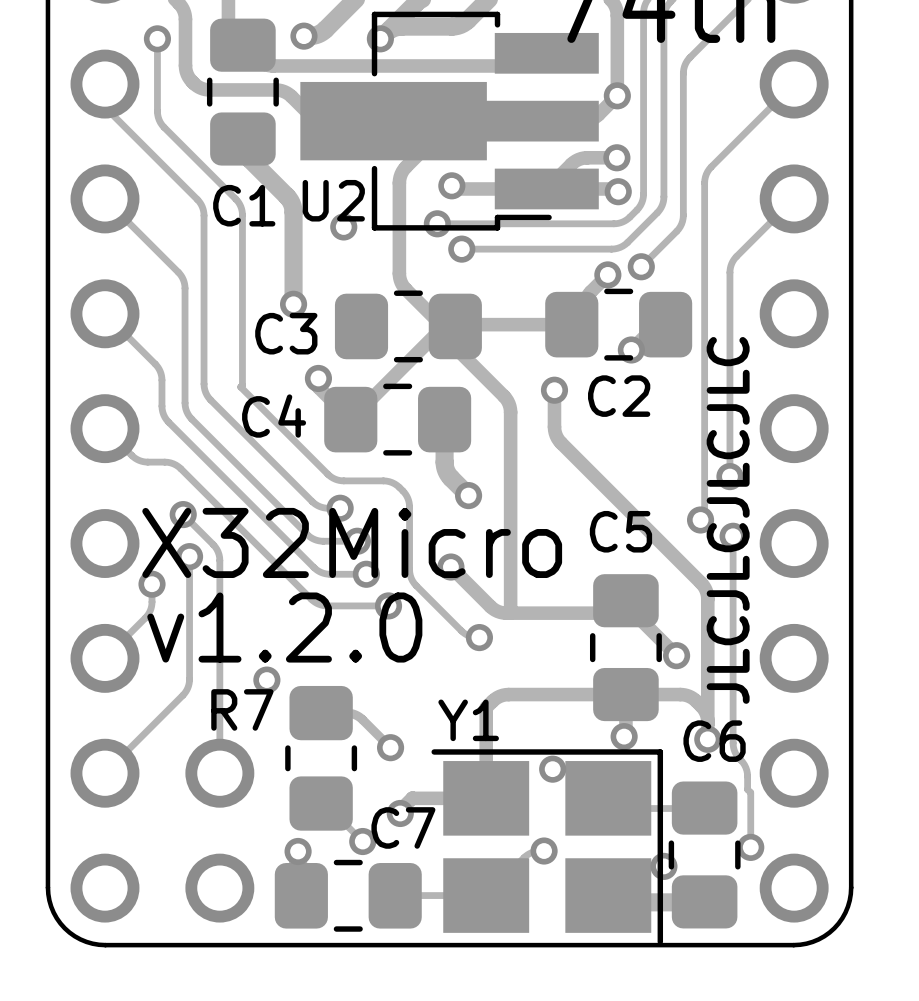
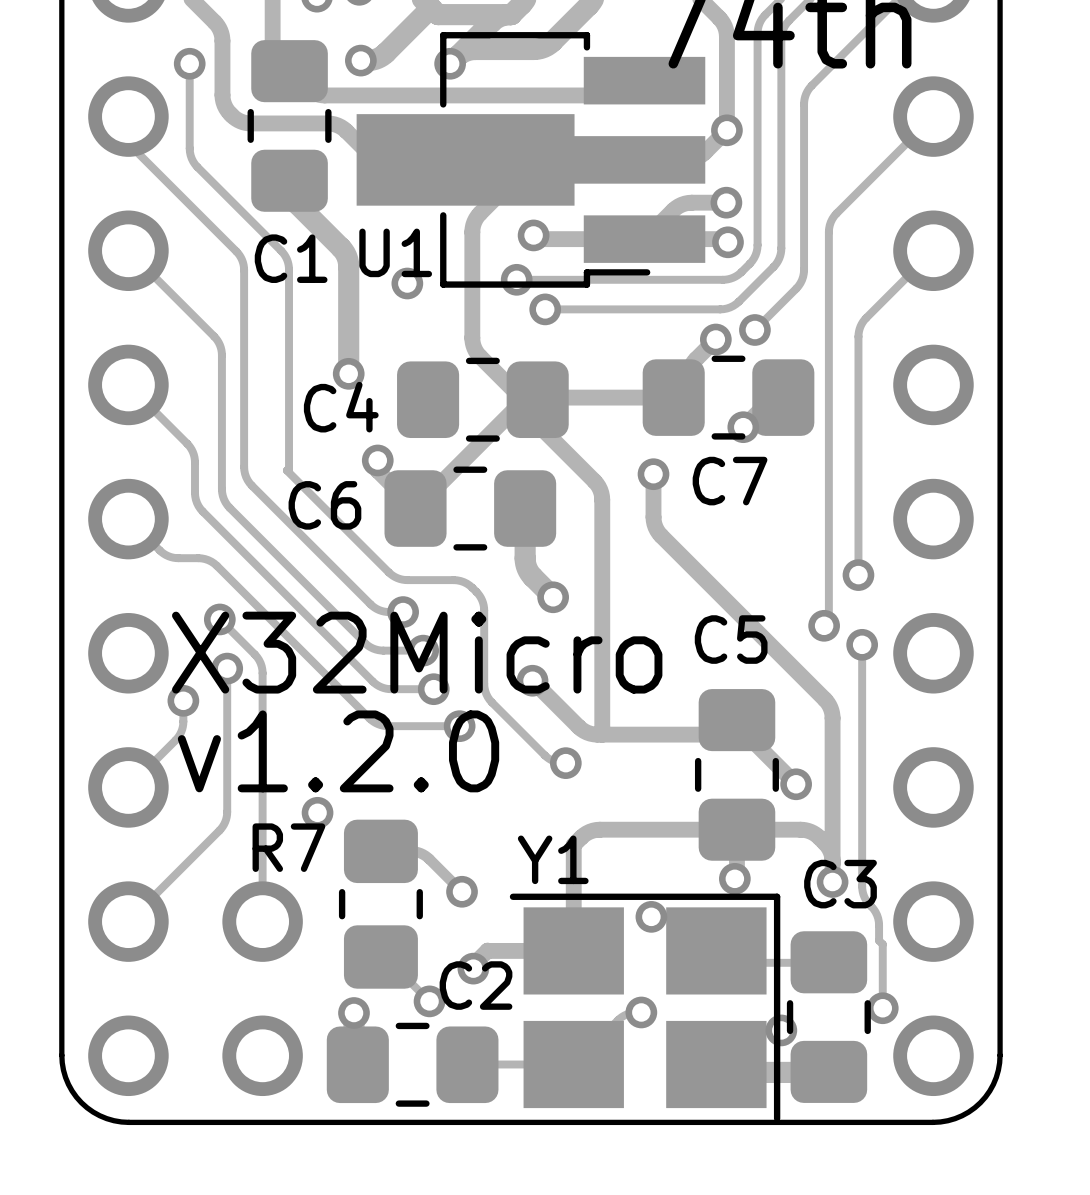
U2 name: U2 (333, 200) -> U1 (395, 252)
C3 name: C3 (286, 333) -> C4 (341, 407)
drawing: [706, 336, 750, 704] -> none
C2 name: C2 (619, 396) -> C7 (730, 481)
C4 name: C4 (274, 416) -> C6 (324, 505)
C6 name: C6 (714, 741) -> C3 (840, 884)
C7 name: C7 (403, 827) -> C2 (476, 985)

